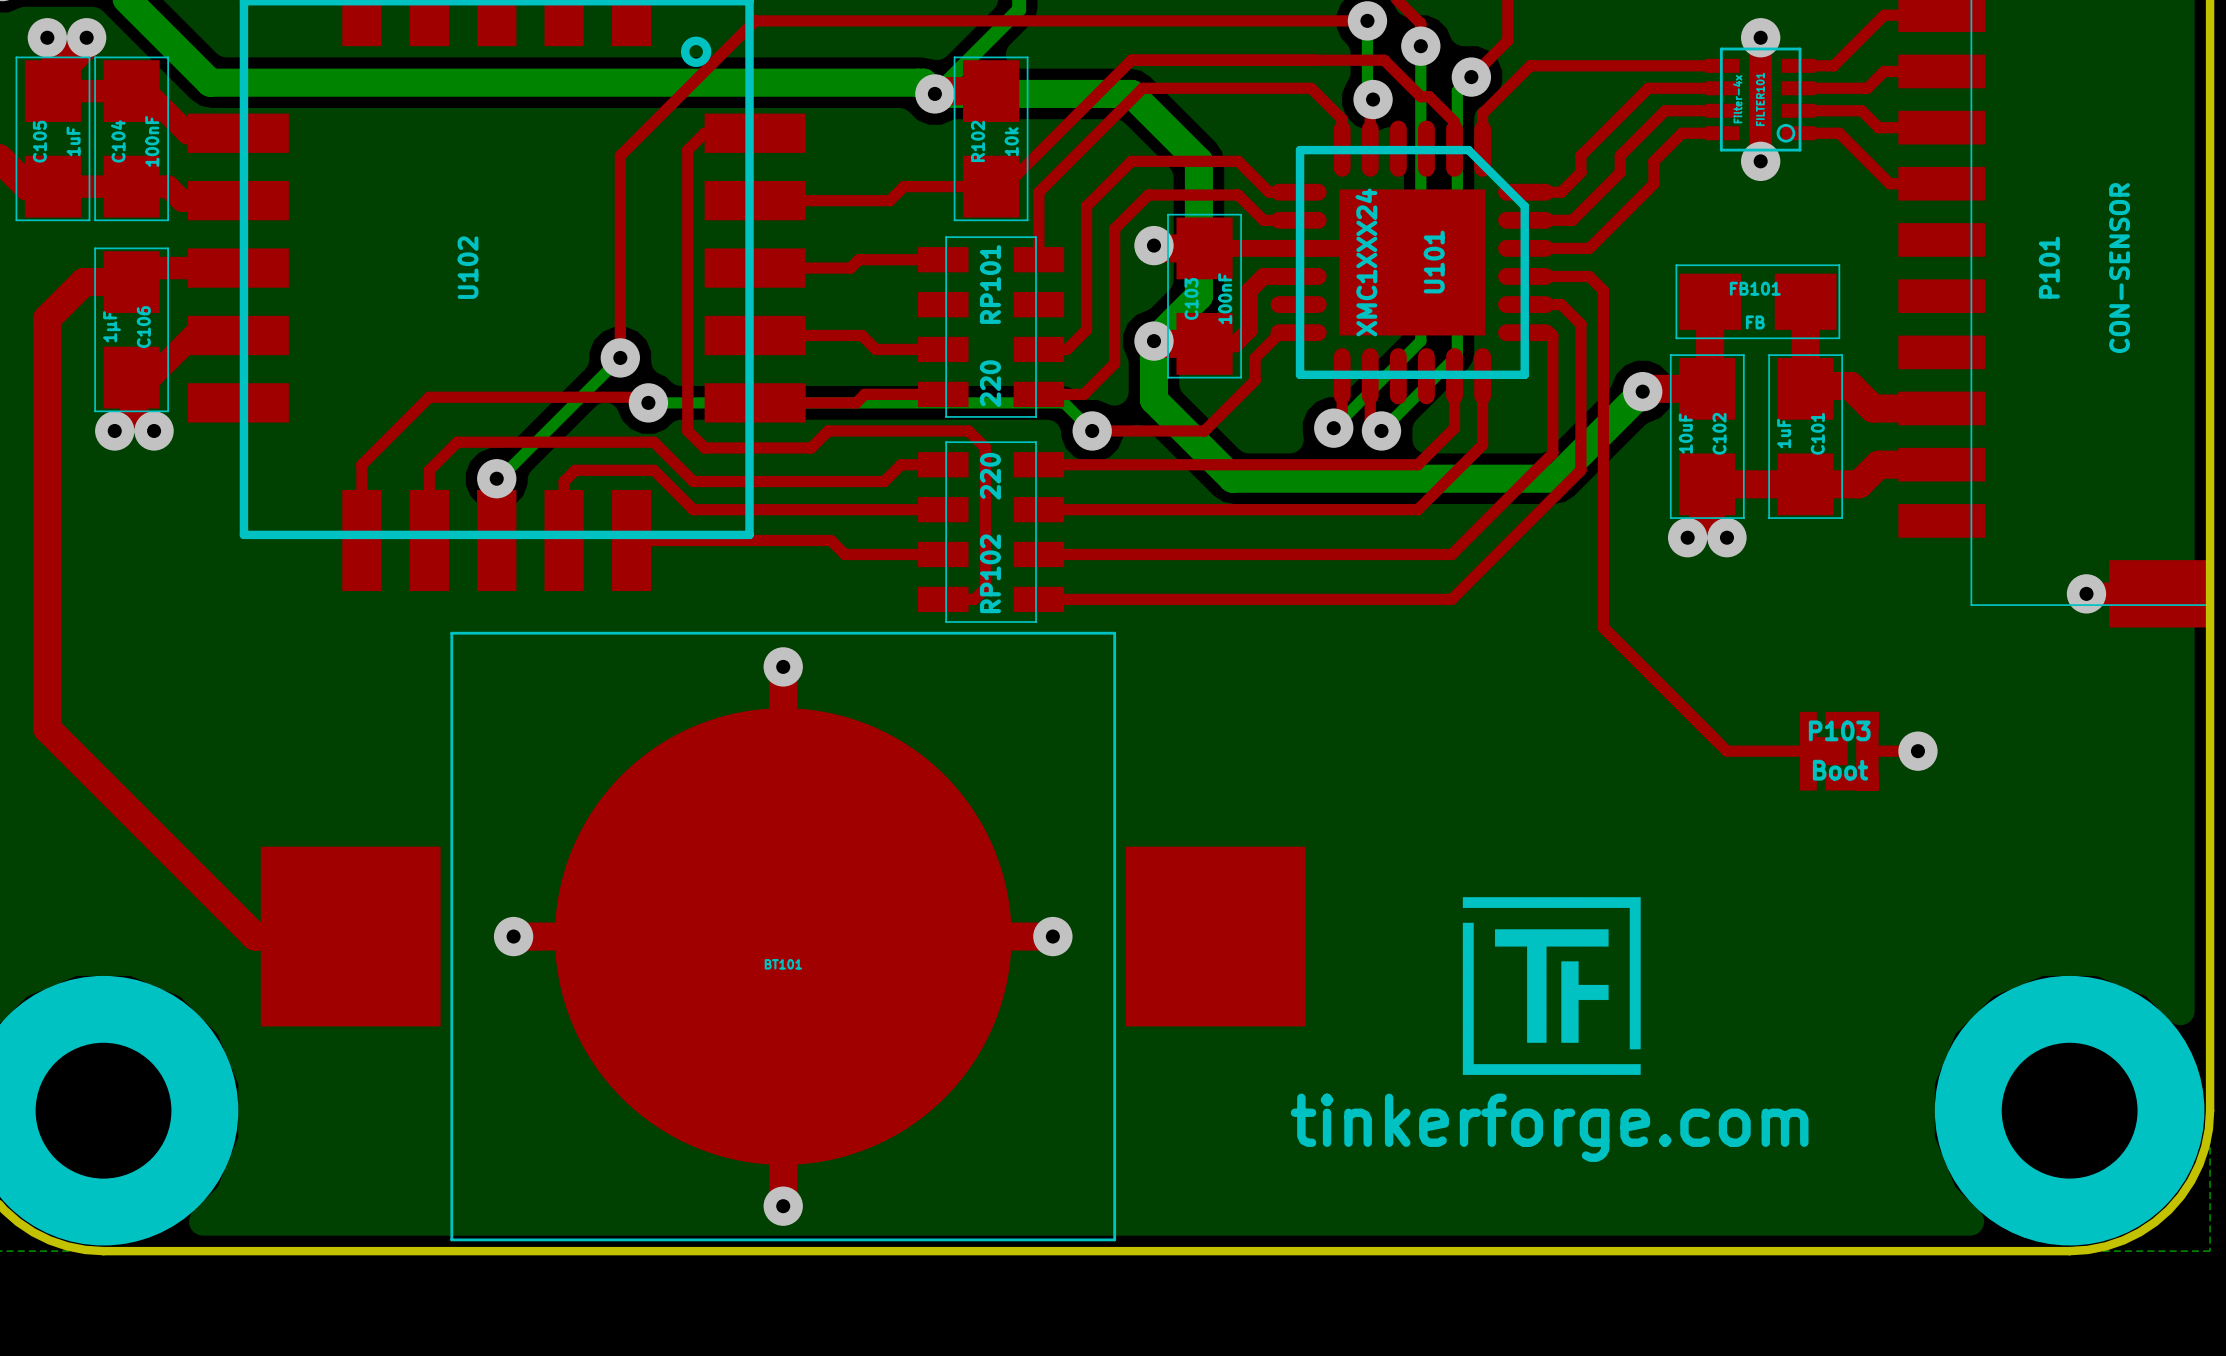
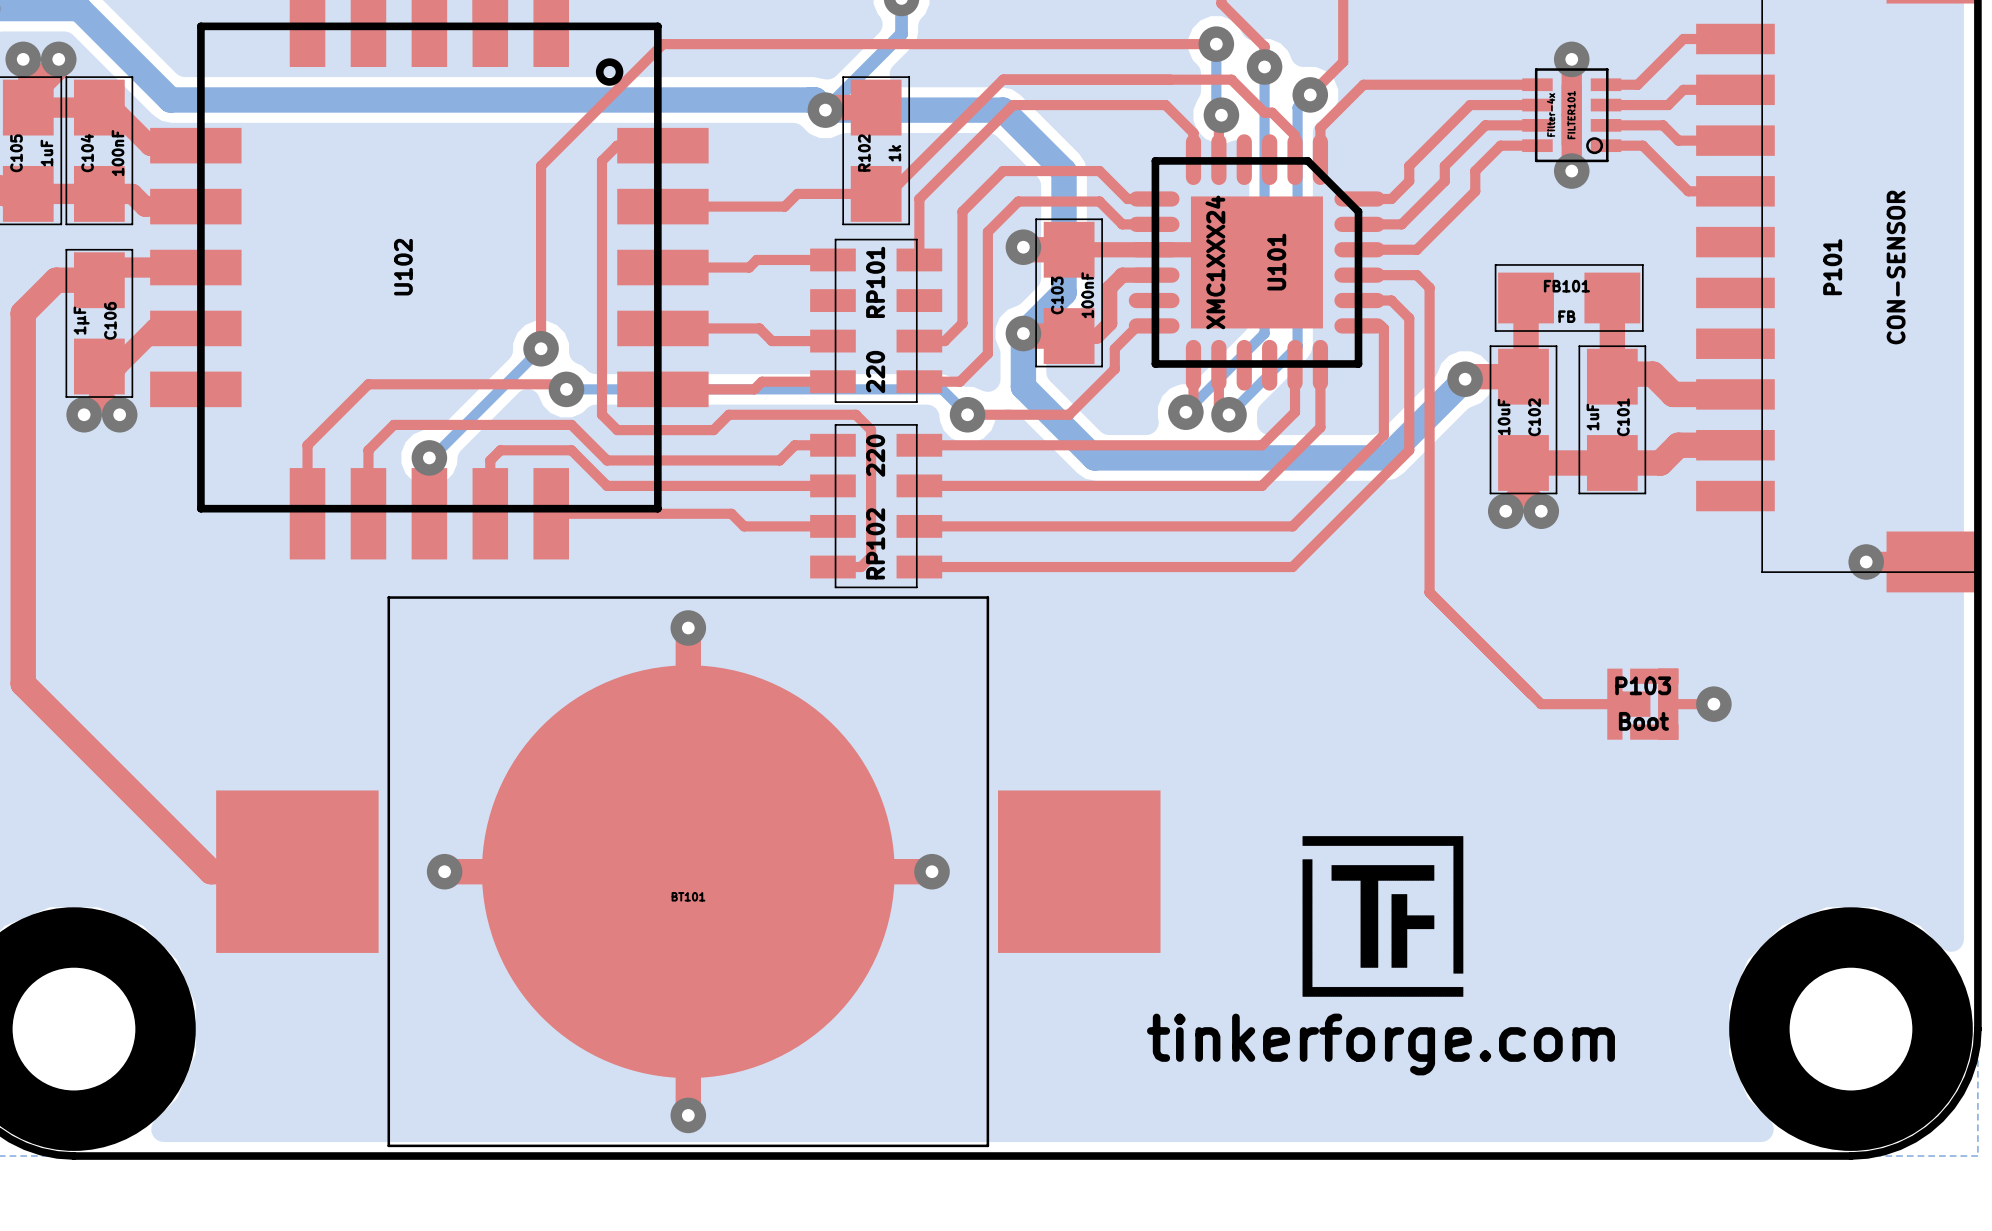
R102 value: 10k (1011, 141) -> 1k (894, 153)

